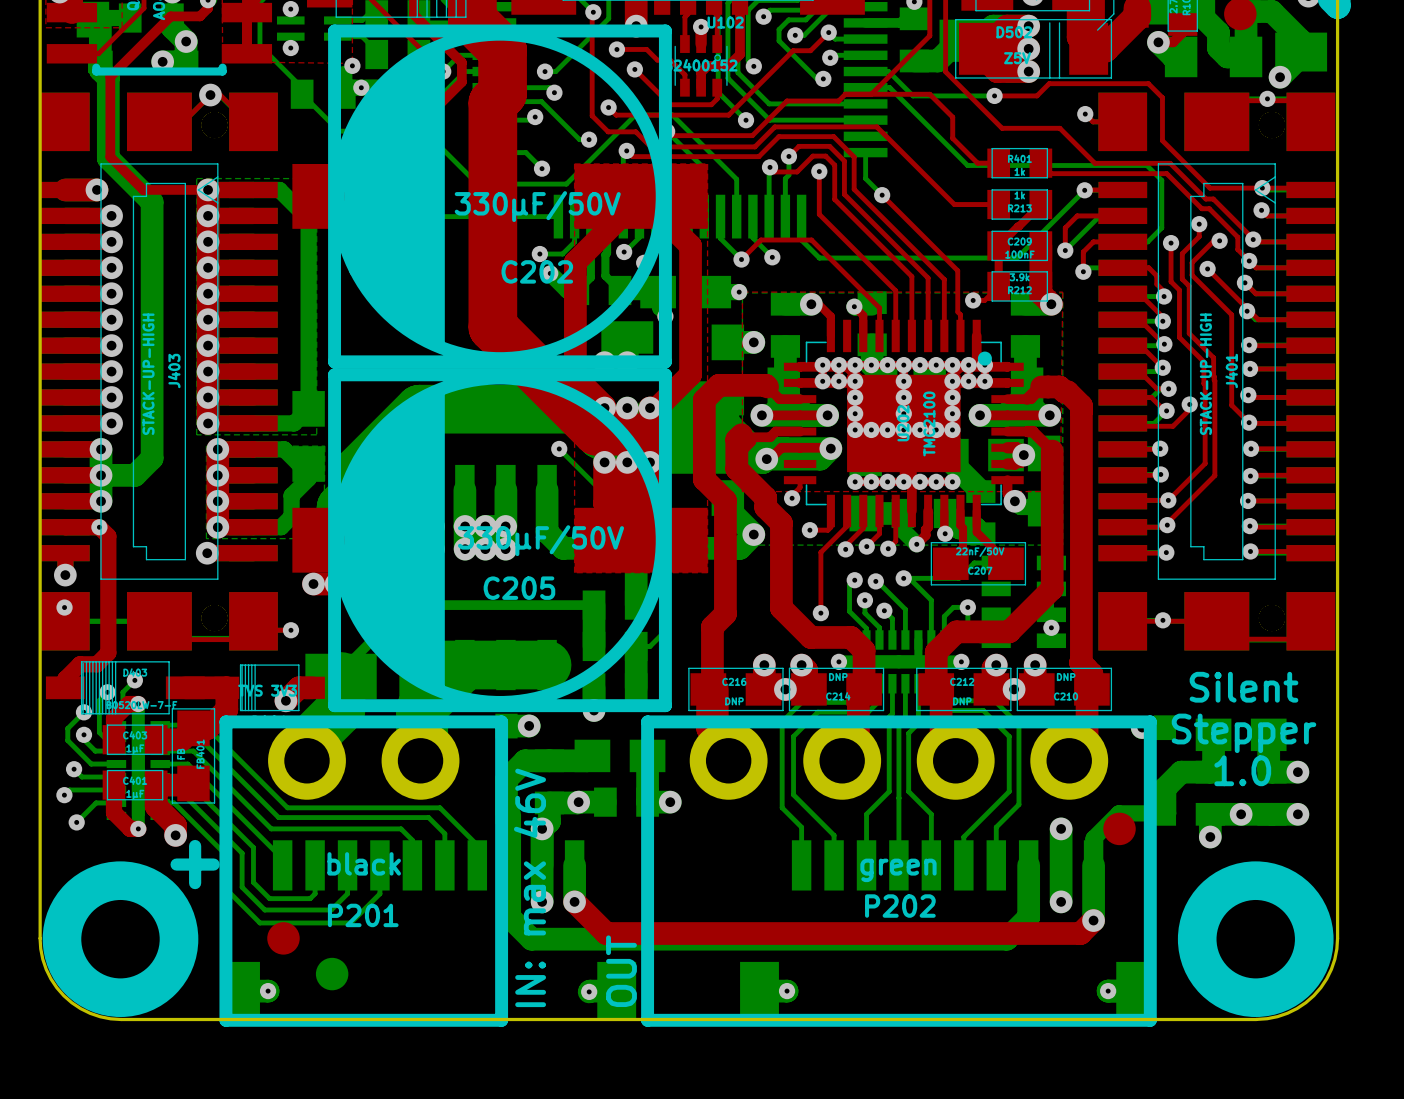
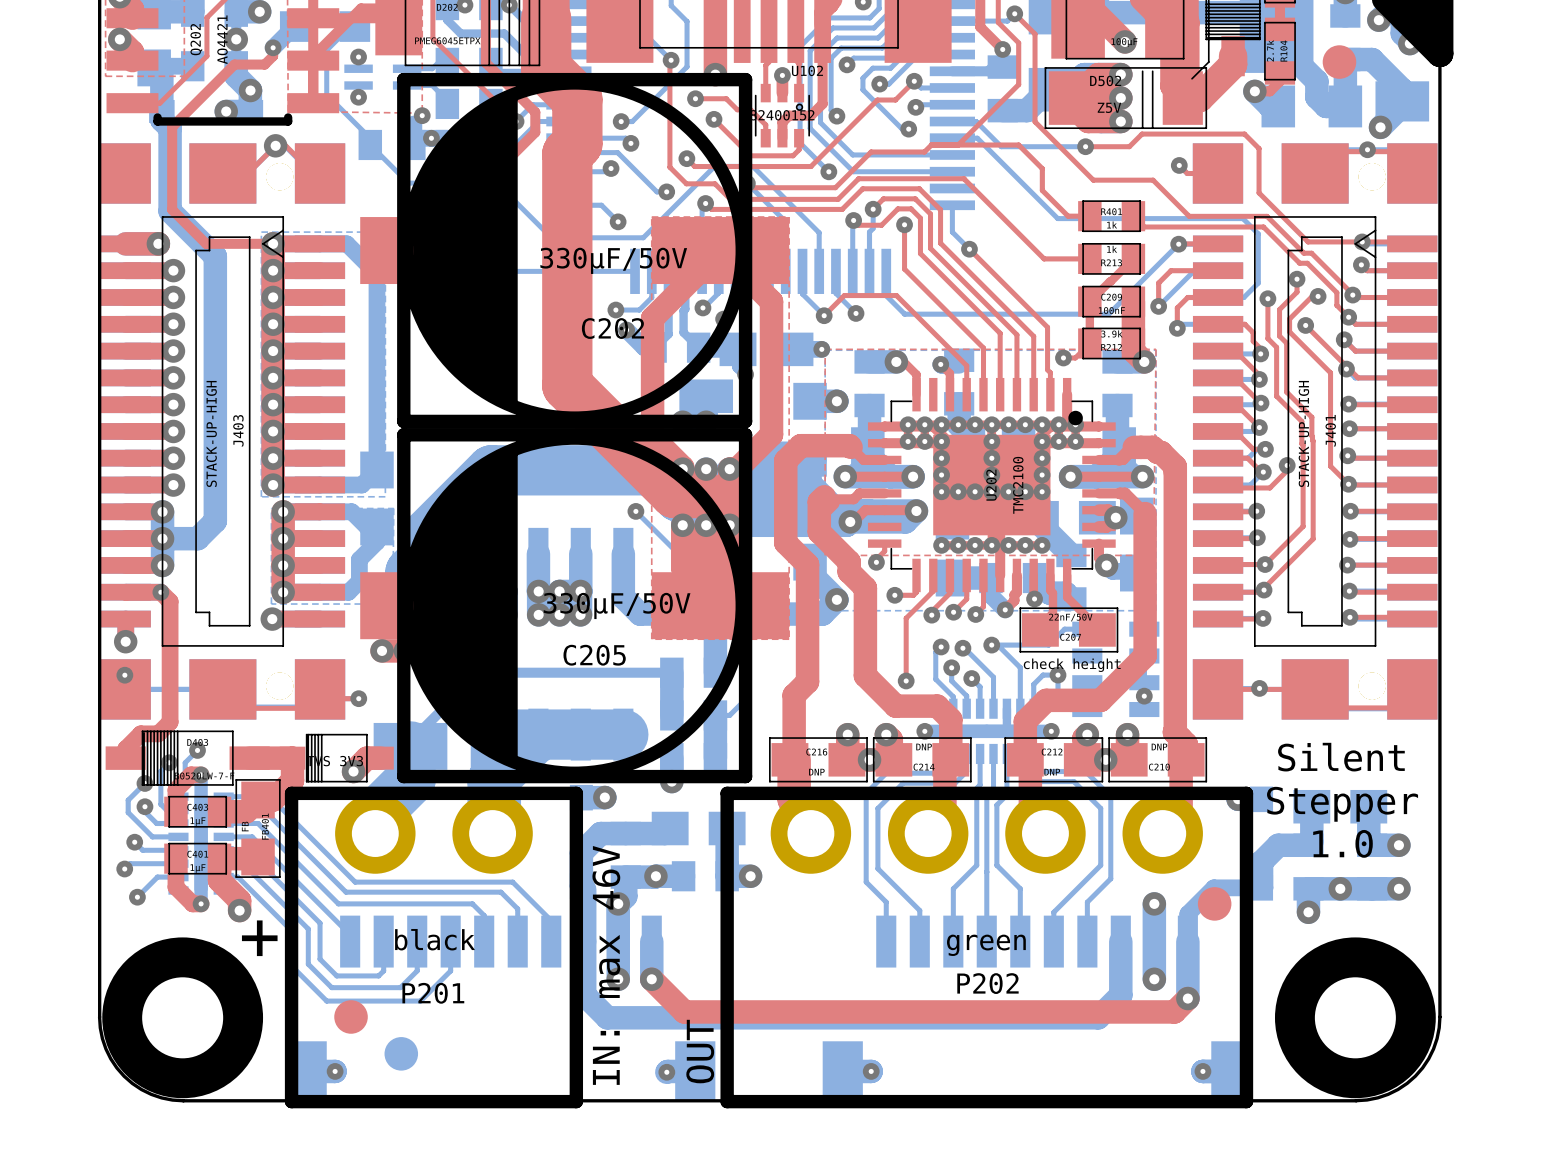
text: none -> check height (1072, 665)

